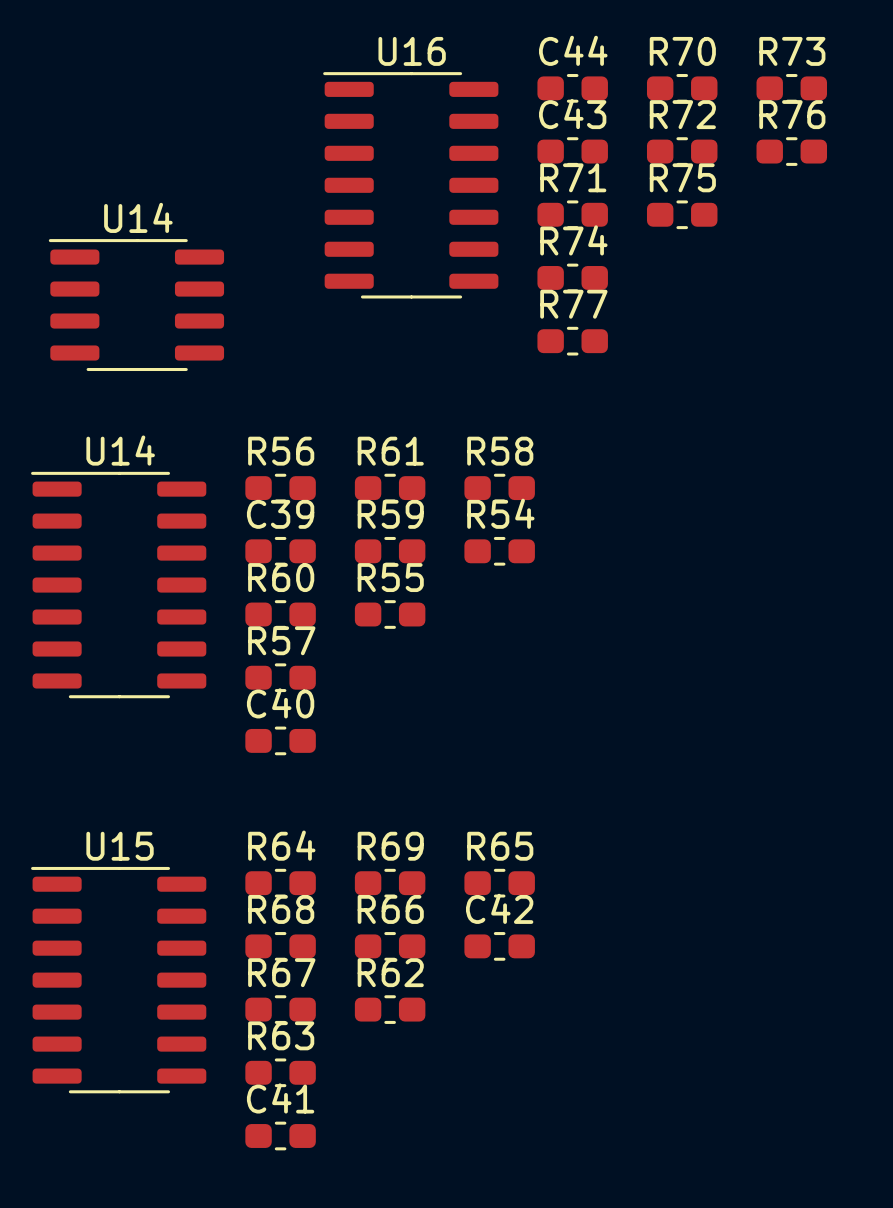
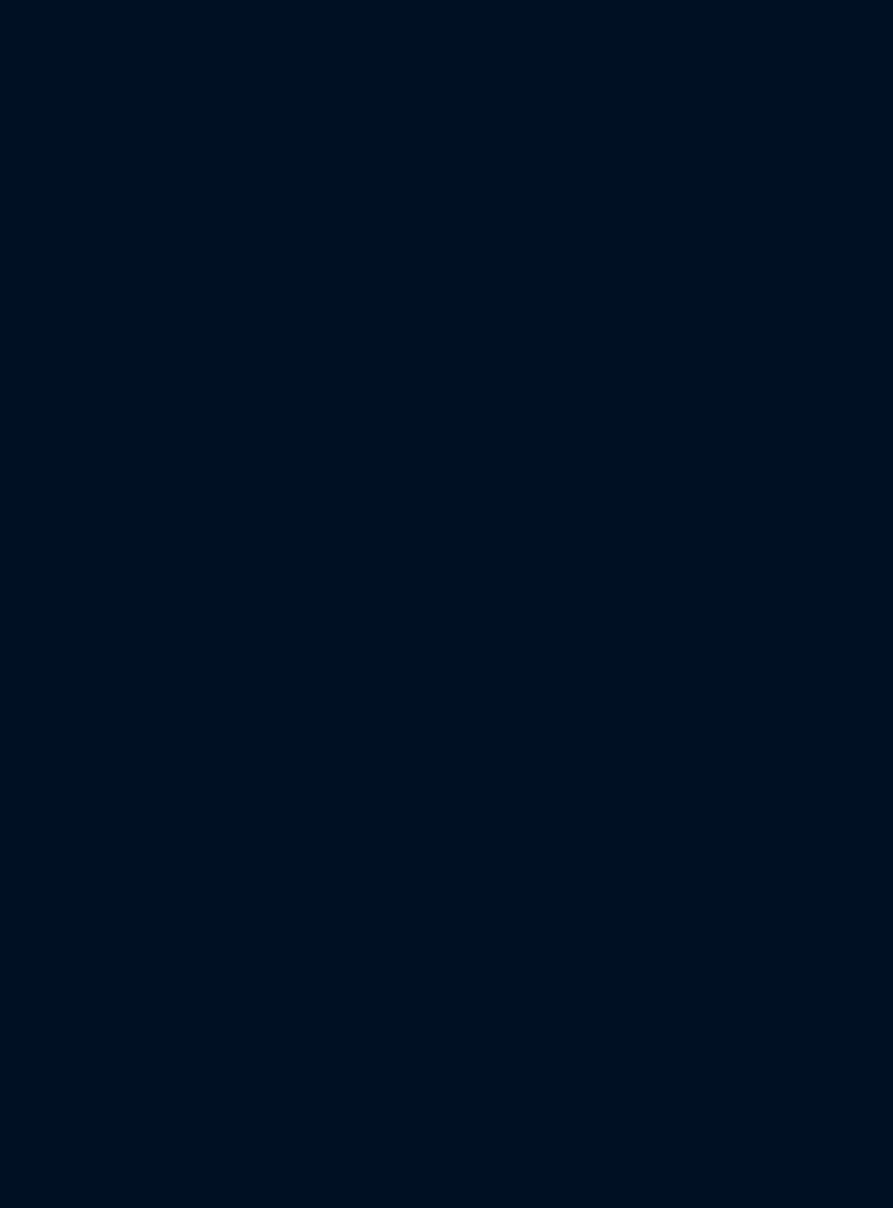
C44: (572, 88) -> none
R70: (682, 88) -> none
R73: (791, 88) -> none
C43: (572, 151) -> none
R72: (682, 151) -> none
R76: (791, 151) -> none
U16: (410, 185) -> none
R71: (572, 214) -> none
R75: (682, 214) -> none
R74: (572, 277) -> none
U14: (136, 305) -> none
R77: (572, 341) -> none
R56: (280, 488) -> none
R61: (390, 488) -> none
R58: (499, 488) -> none
C39: (280, 551) -> none
R59: (390, 551) -> none
R54: (499, 551) -> none
U14: (118, 585) -> none
R60: (280, 614) -> none
R55: (390, 614) -> none
R57: (280, 677) -> none
C40: (280, 740) -> none
R64: (280, 883) -> none
R69: (390, 883) -> none
R65: (499, 883) -> none
R68: (280, 946) -> none
R66: (390, 946) -> none
C42: (499, 946) -> none
U15: (118, 980) -> none
R67: (280, 1009) -> none
R62: (390, 1009) -> none
R63: (280, 1072) -> none
C41: (280, 1136) -> none

